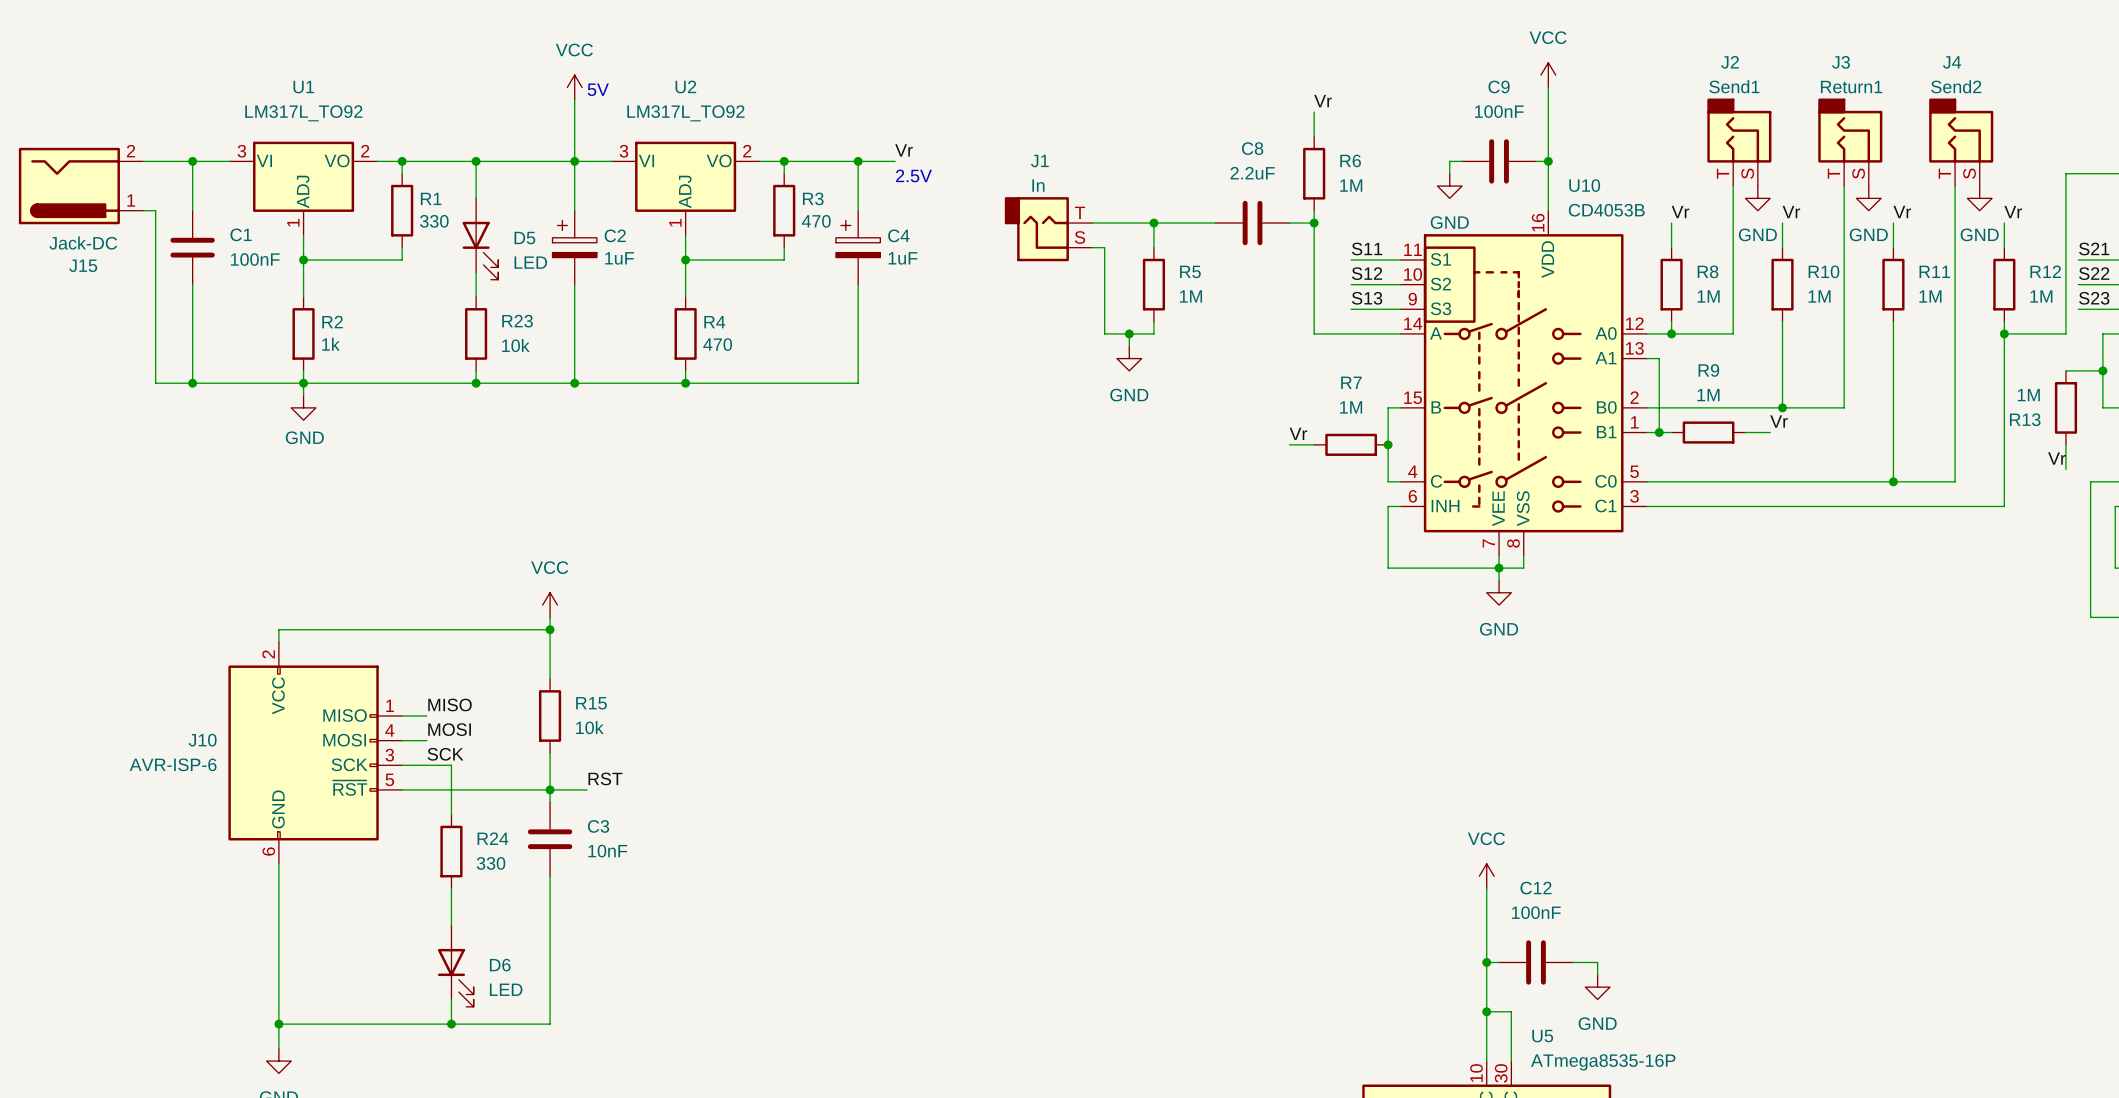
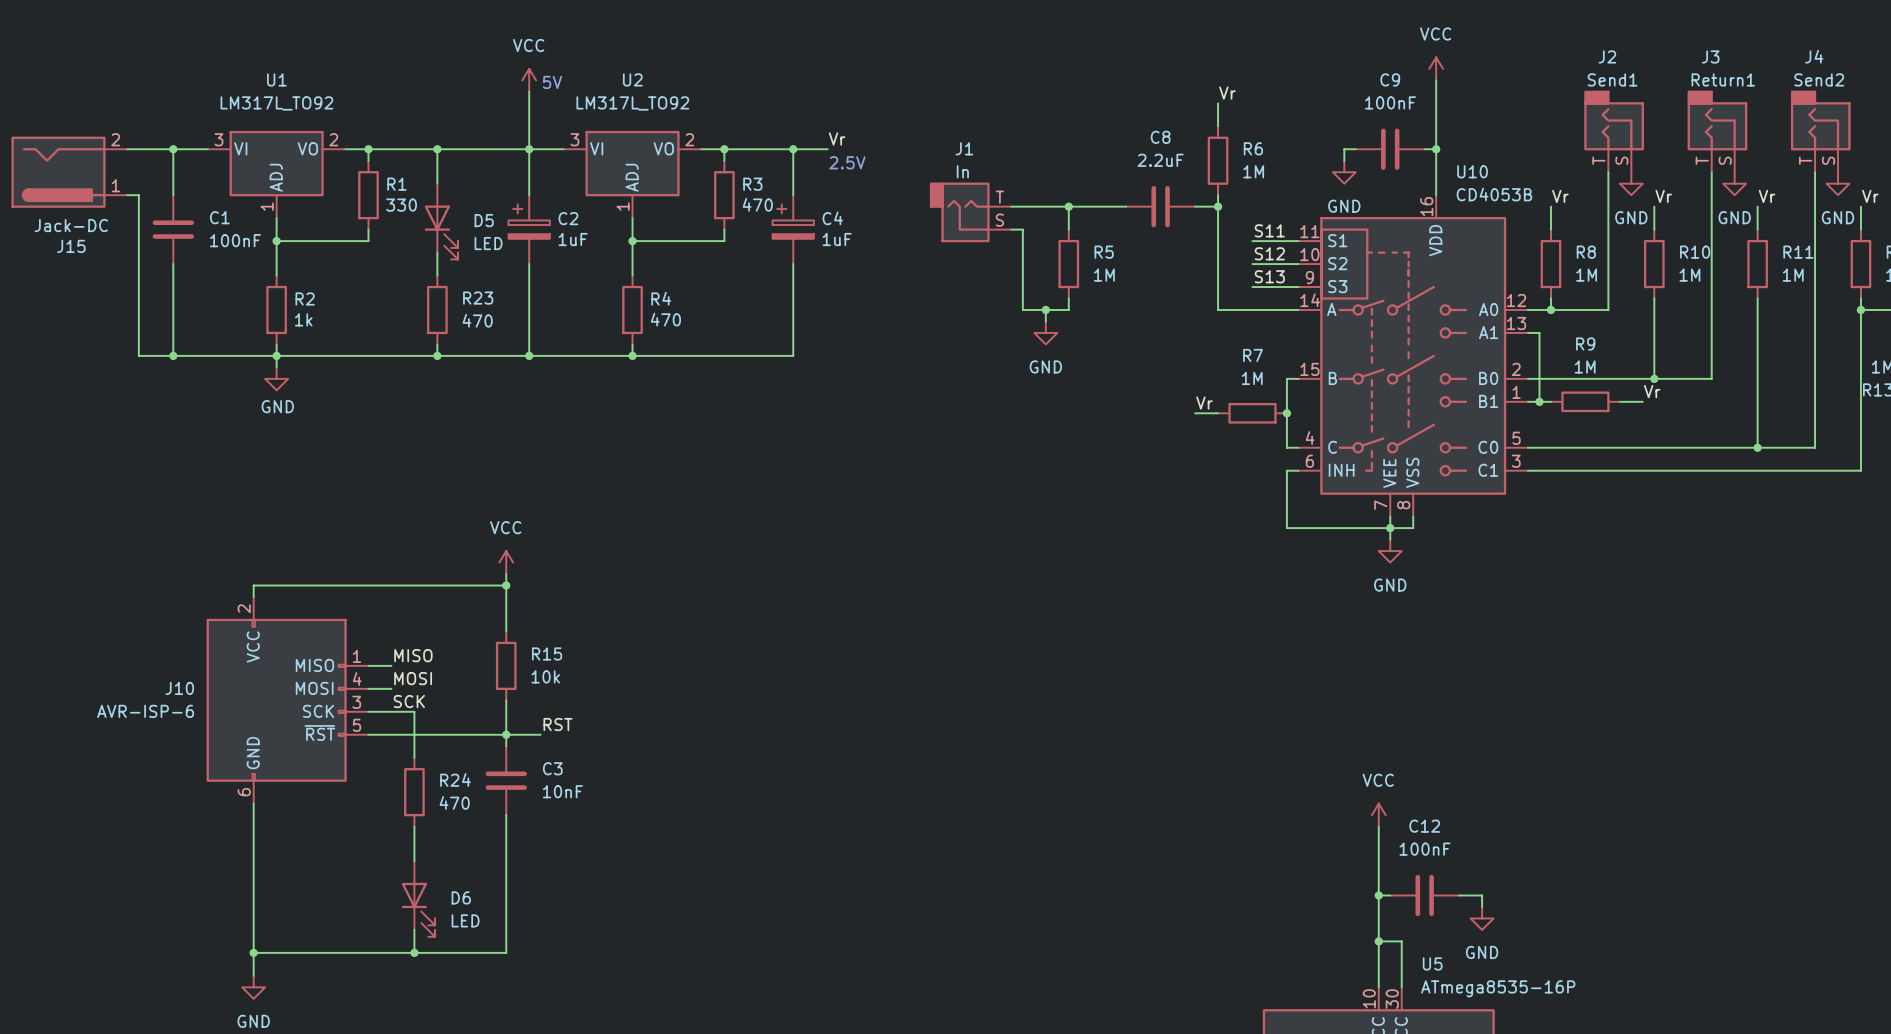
R23 value: 10k (515, 345) -> 470 (477, 320)
R24 value: 330 (491, 863) -> 470 (454, 802)

